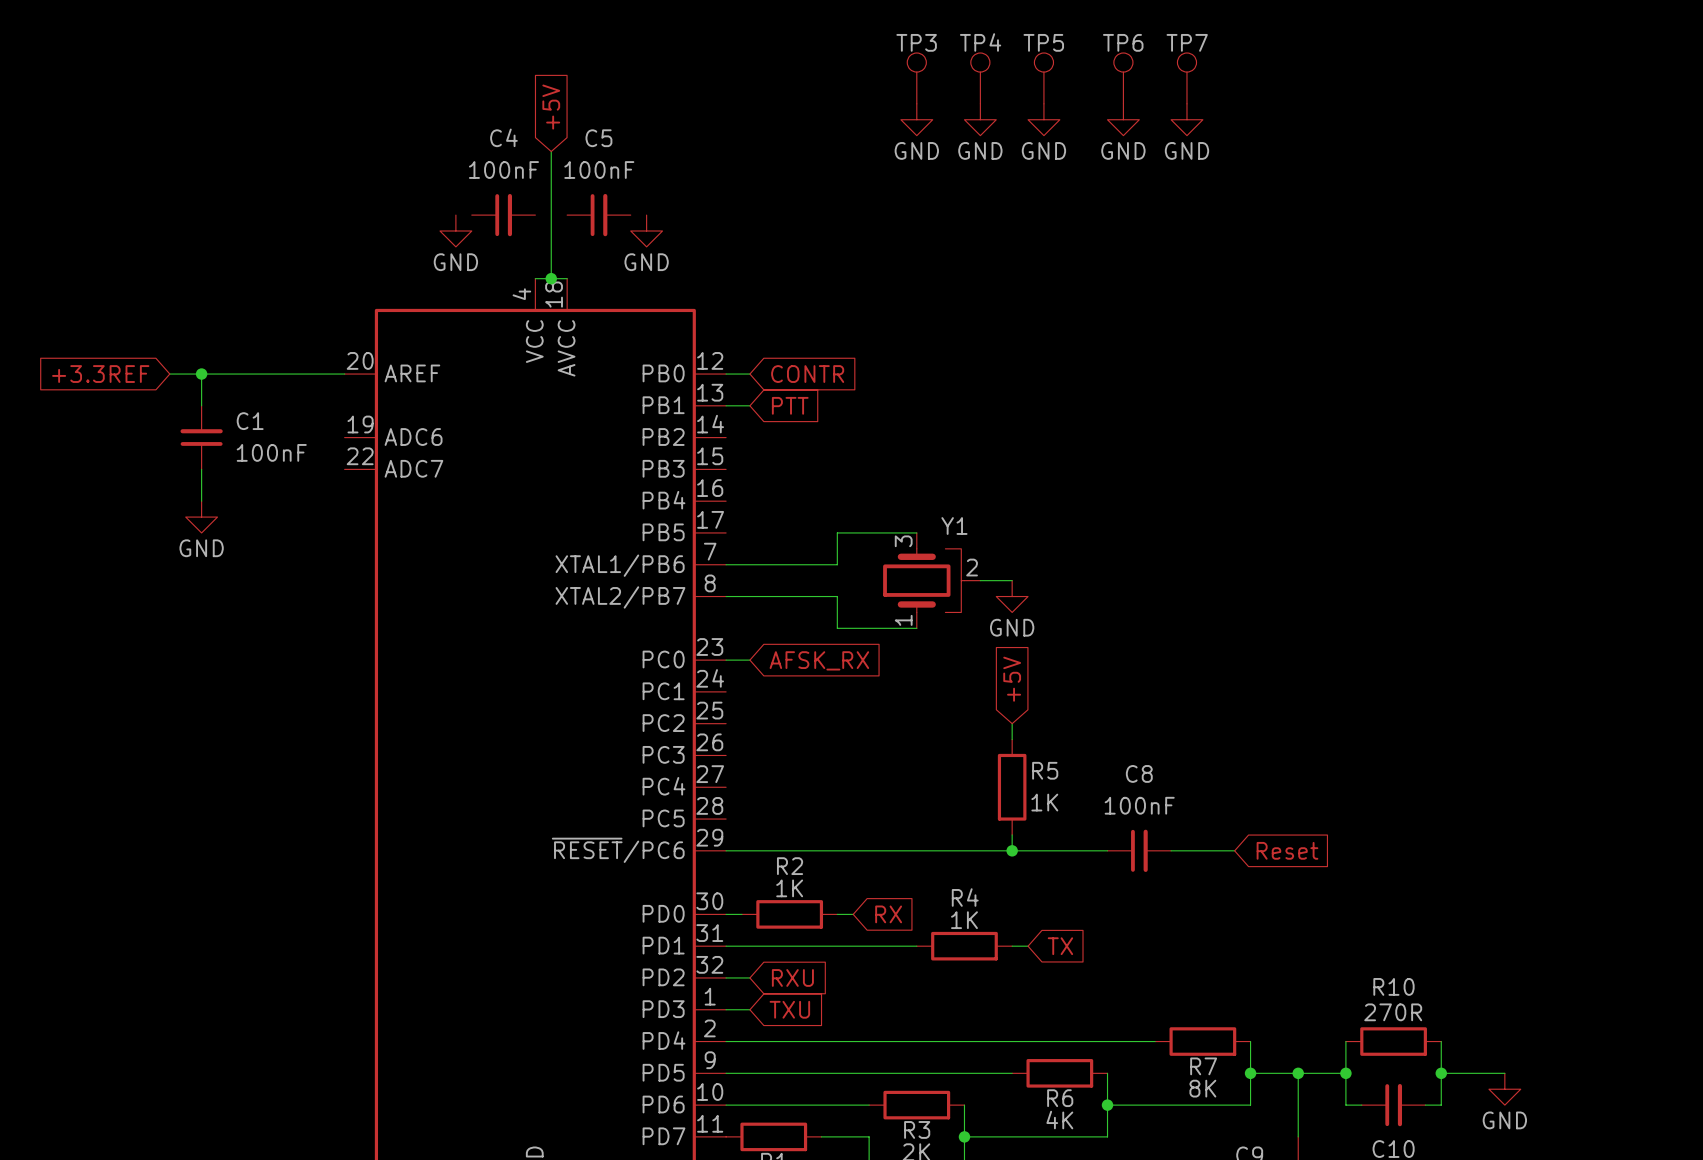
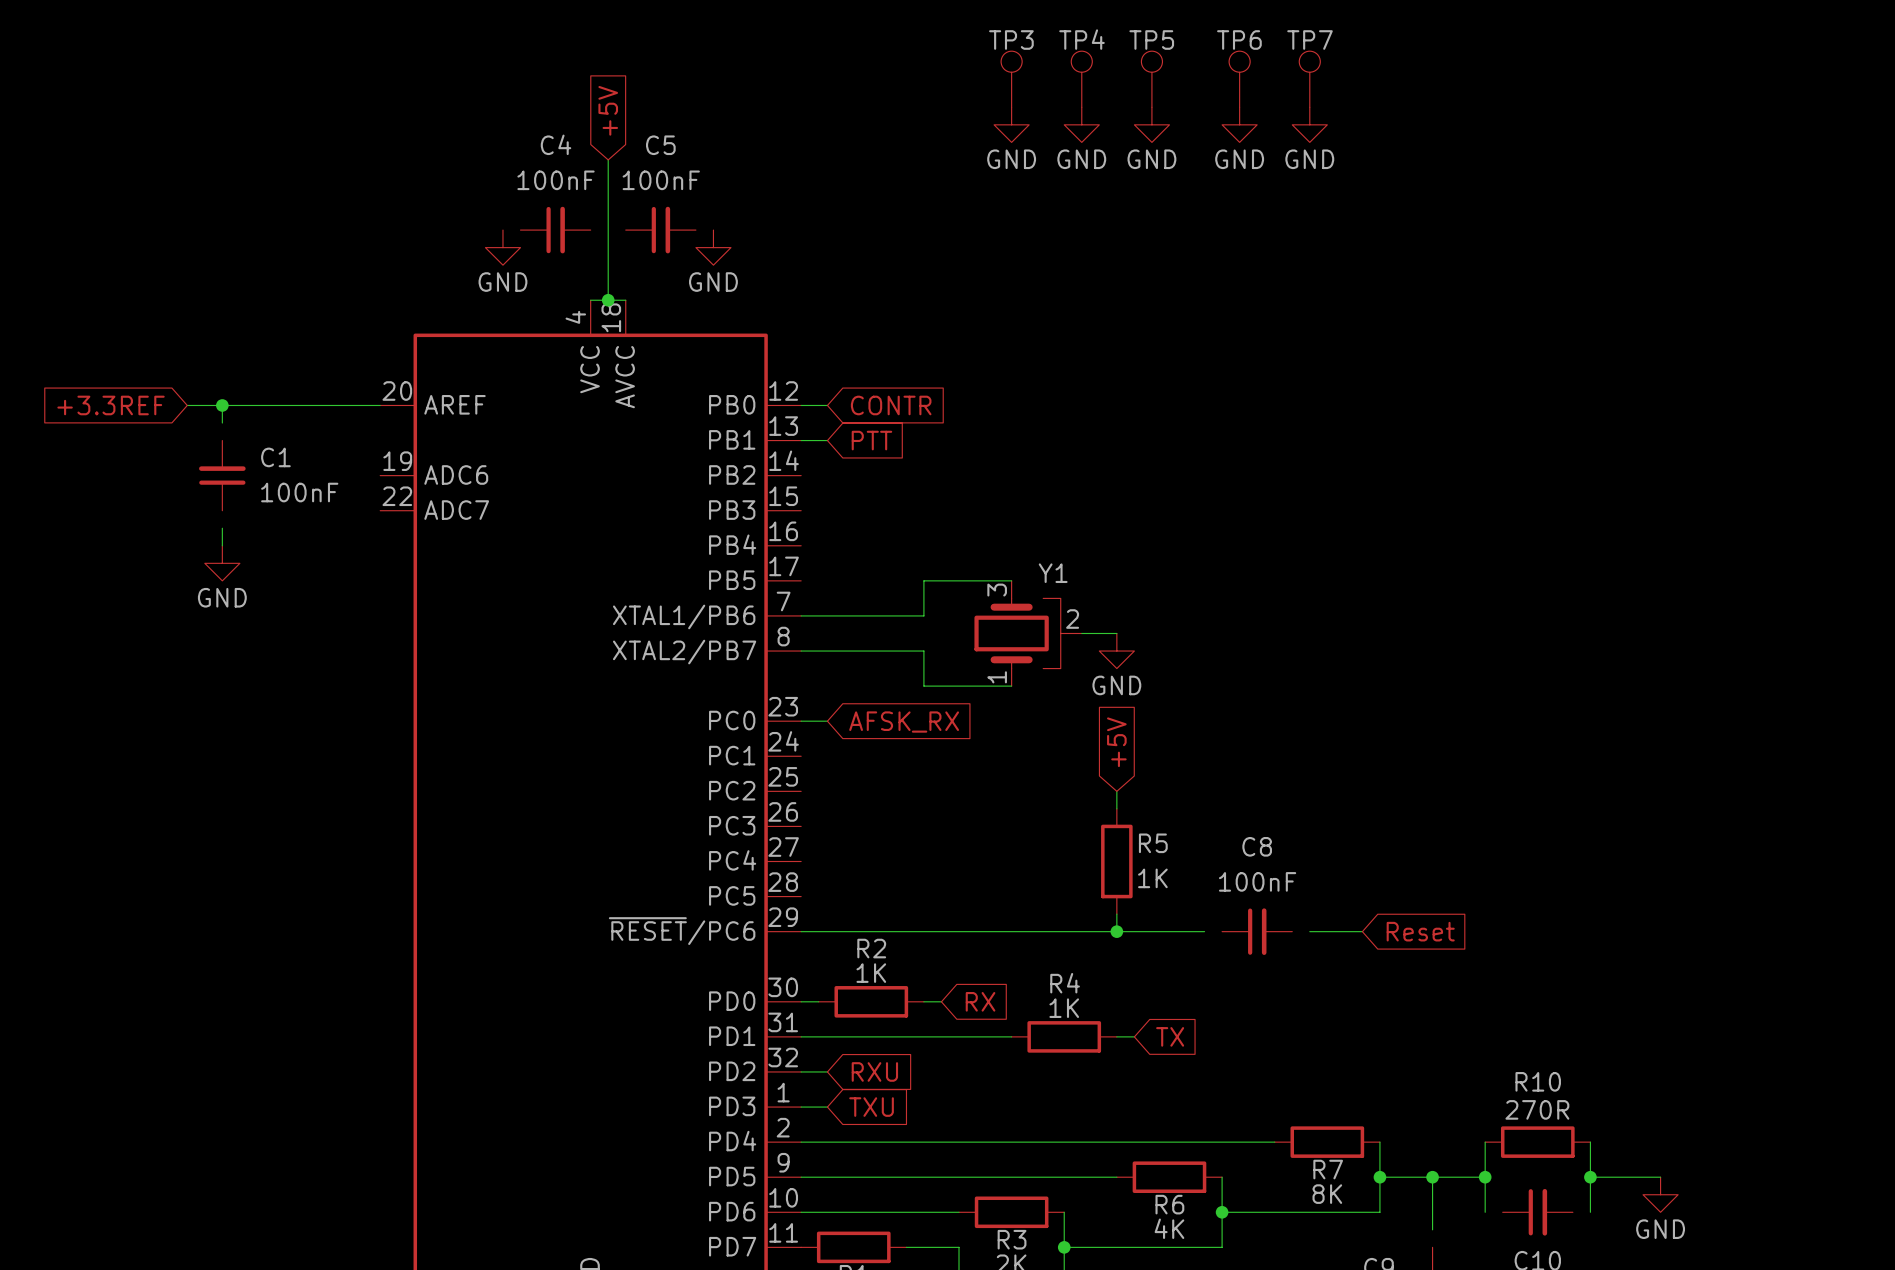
wire: (201, 389) (201, 405) -> none
wire: (201, 469) (201, 485) -> none
wire: (1091, 850) (1107, 850) -> none
wire: (1171, 850) (1186, 850) -> none
wire: (1345, 1105) (1361, 1105) -> none
wire: (1425, 1105) (1441, 1105) -> none
wire: (1298, 1121) (1298, 1136) -> none

